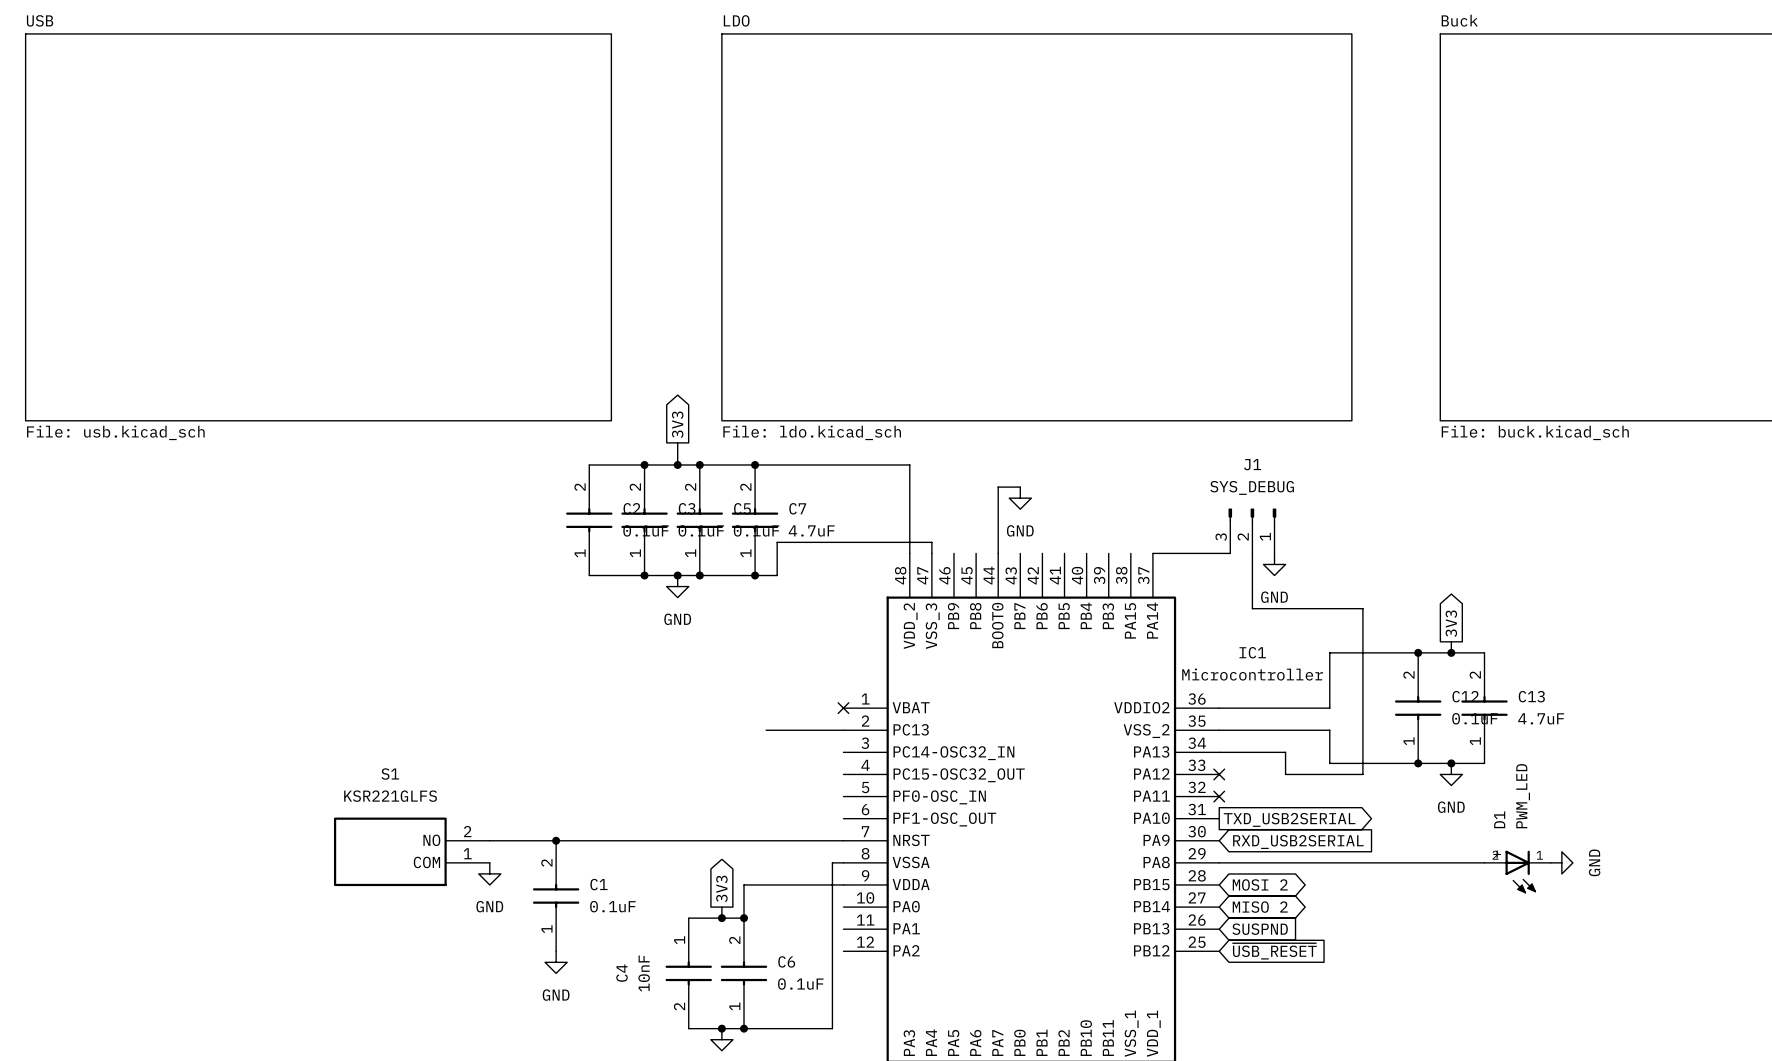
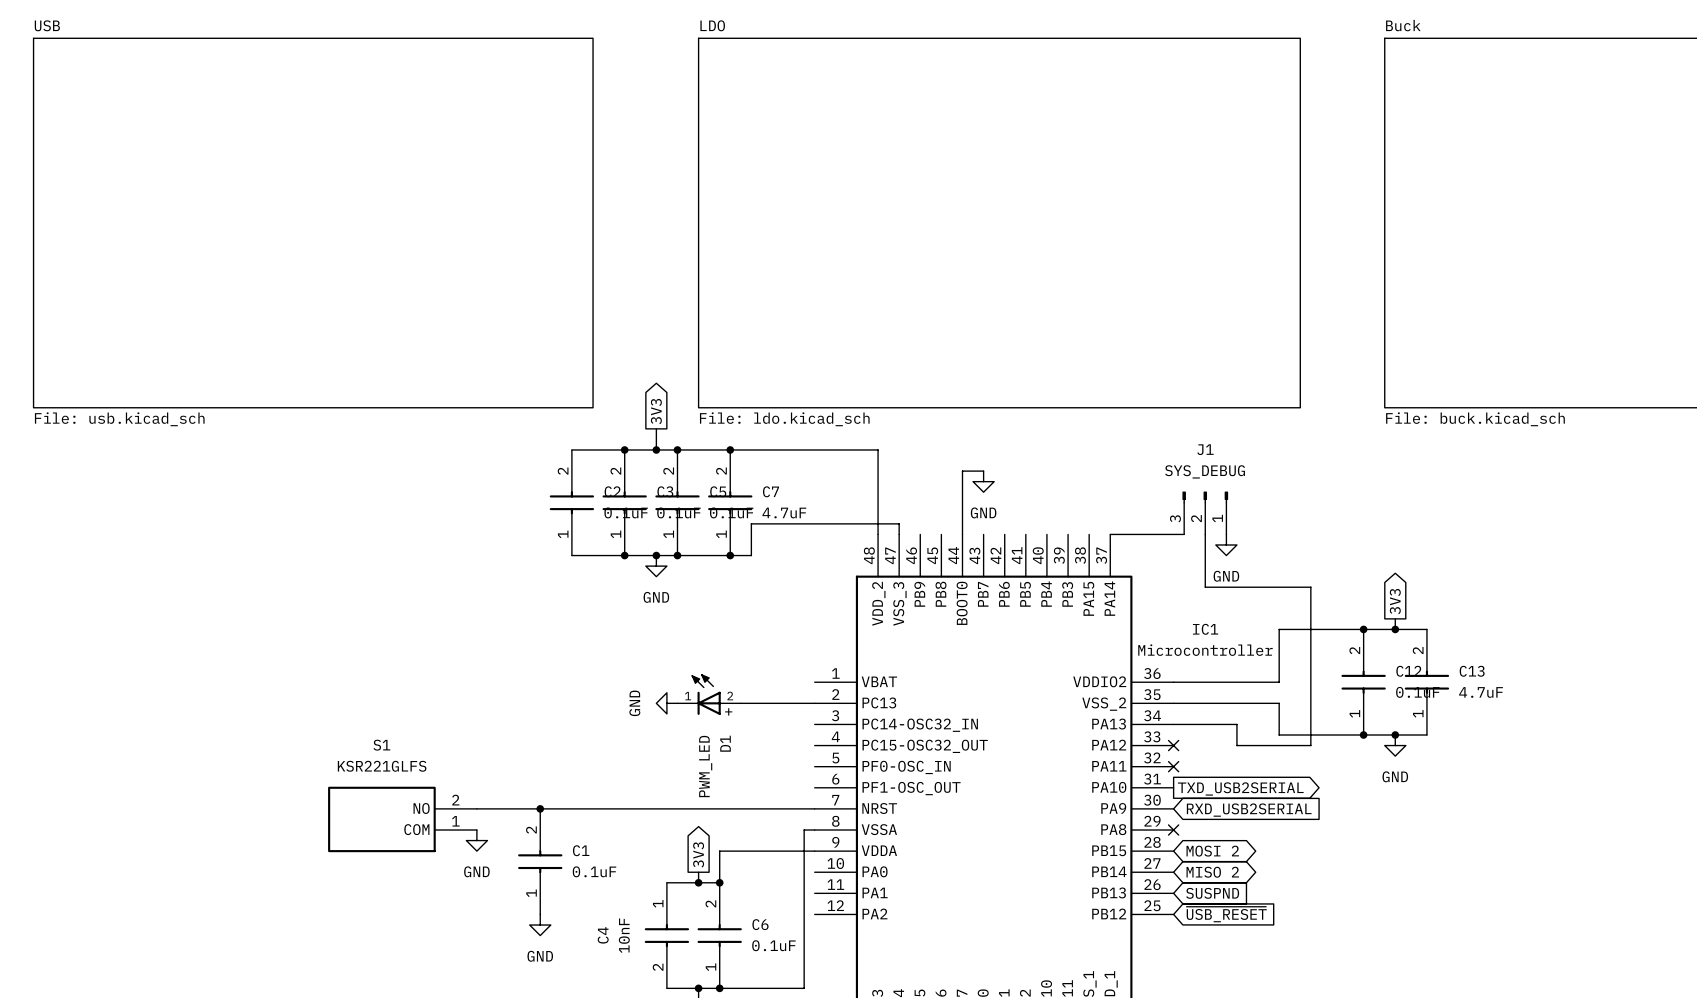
no-connect mark: (843, 708) -> none
power symbol: none -> GND (666, 703)
wire: (1219, 862) (1484, 862) -> none
no-connect mark: none -> (1173, 830)
power symbol: GND (1561, 862) -> none
D1 position: (1517, 872) -> (709, 694)
D1 rotation: 0° (1520, 872) -> 180° (706, 694)

